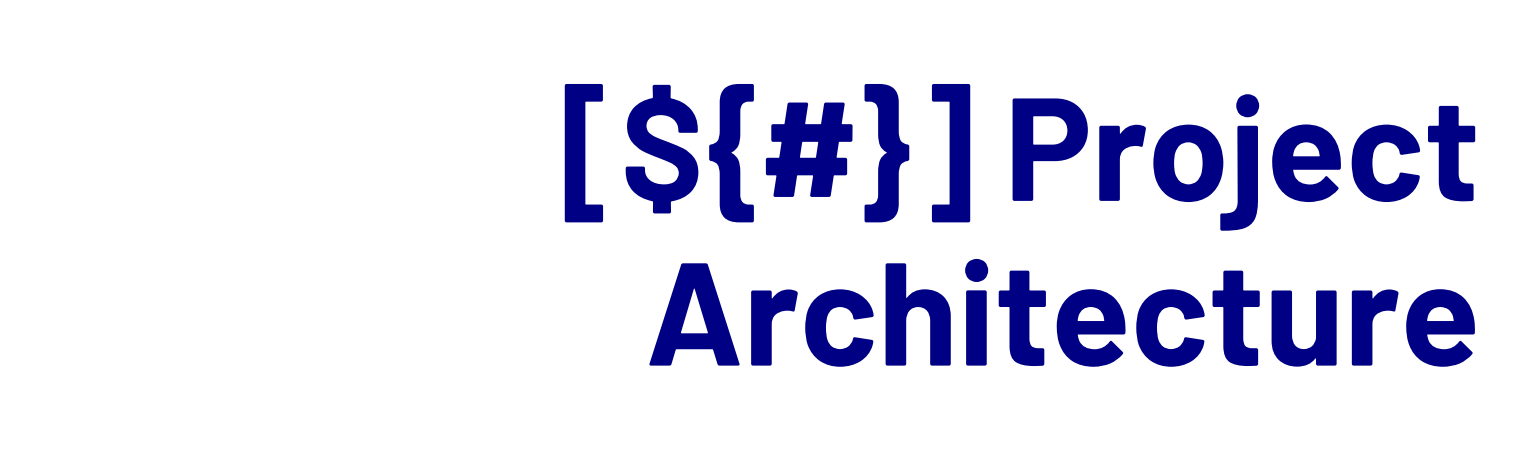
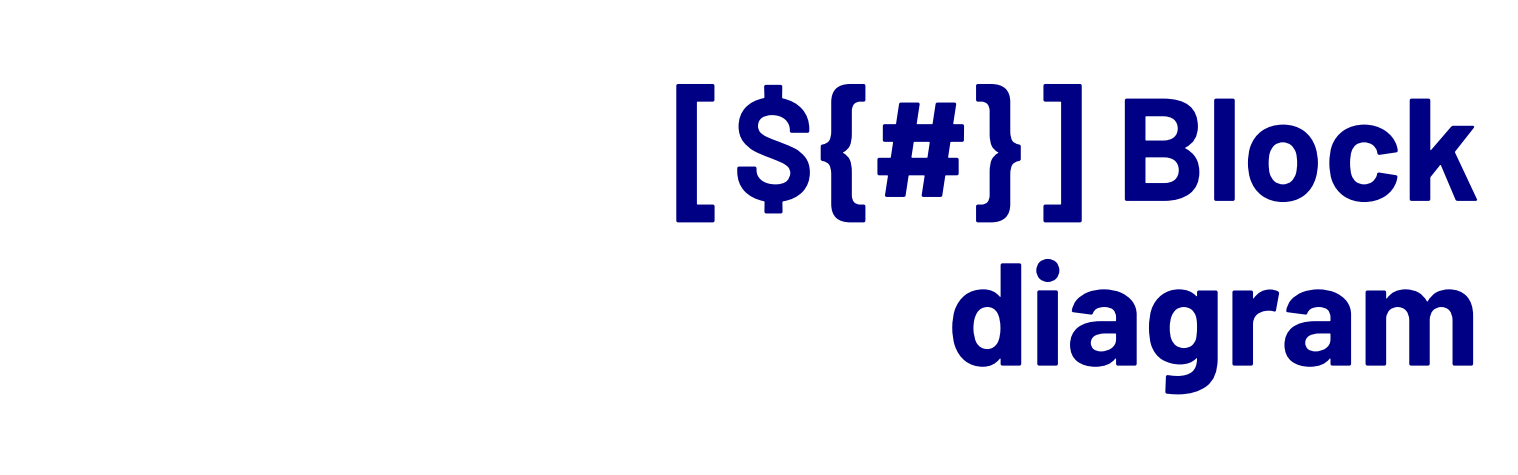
text: [${#}] Project (1019, 157) -> [${#}] Block (1076, 153)
text: Architecture (1062, 312) -> diagram (1212, 326)

